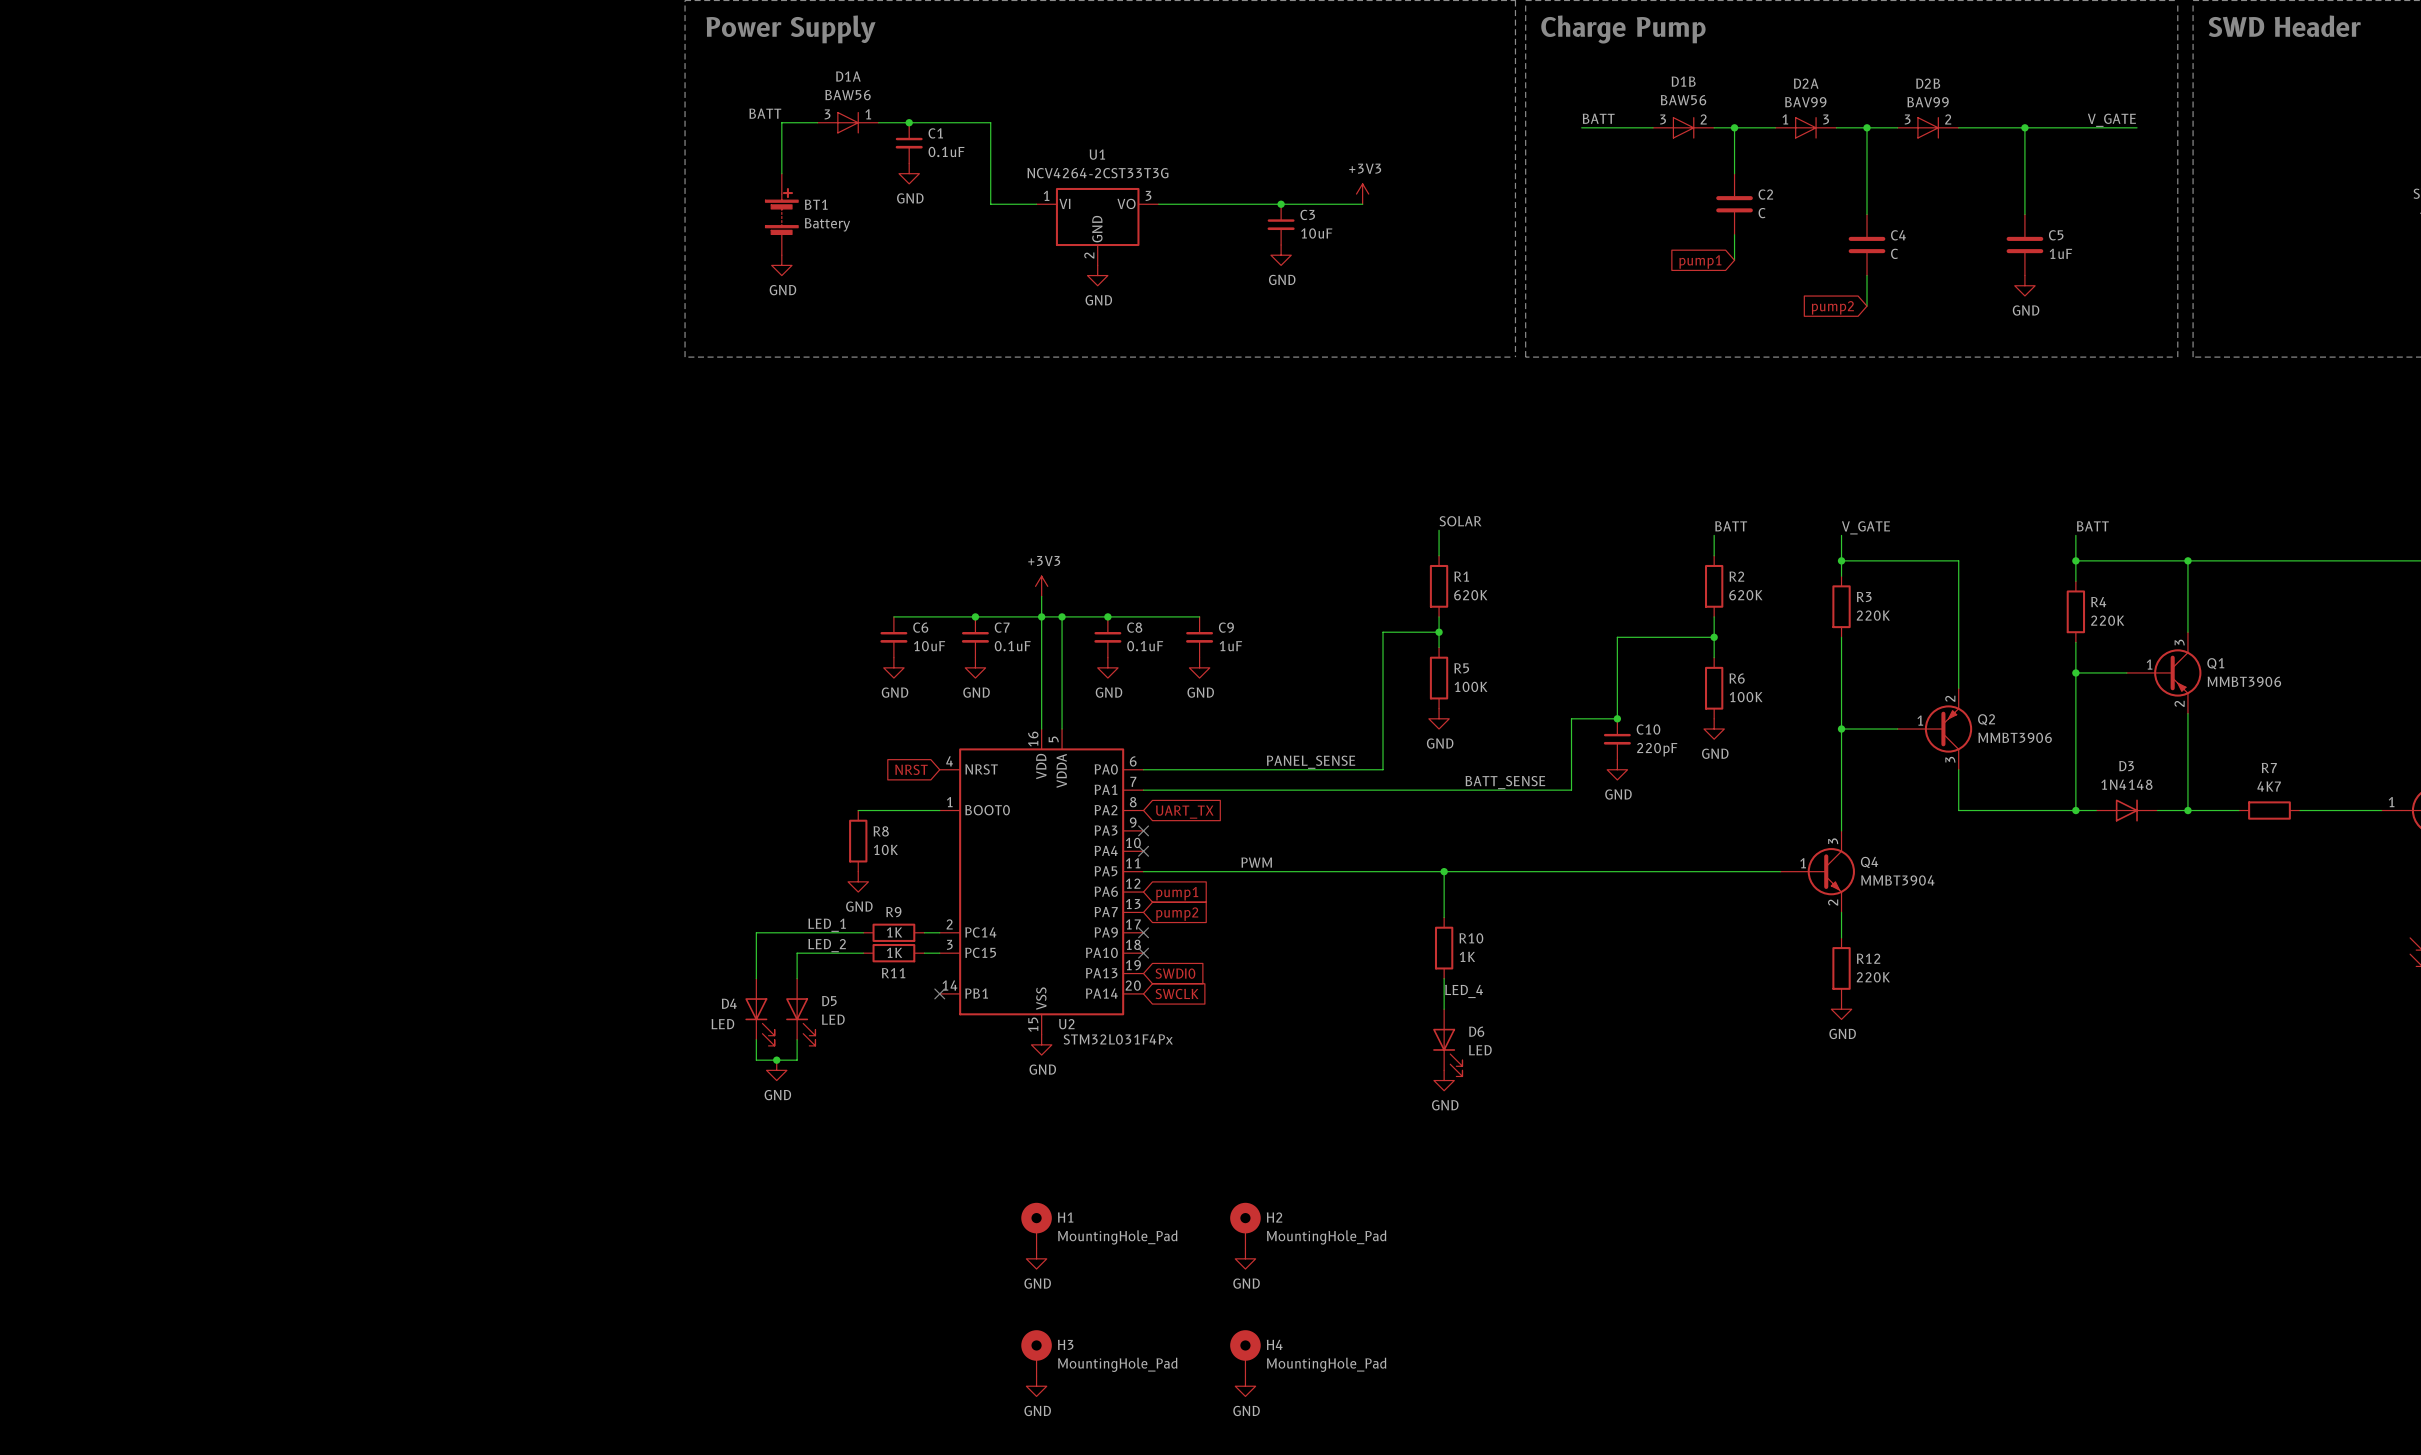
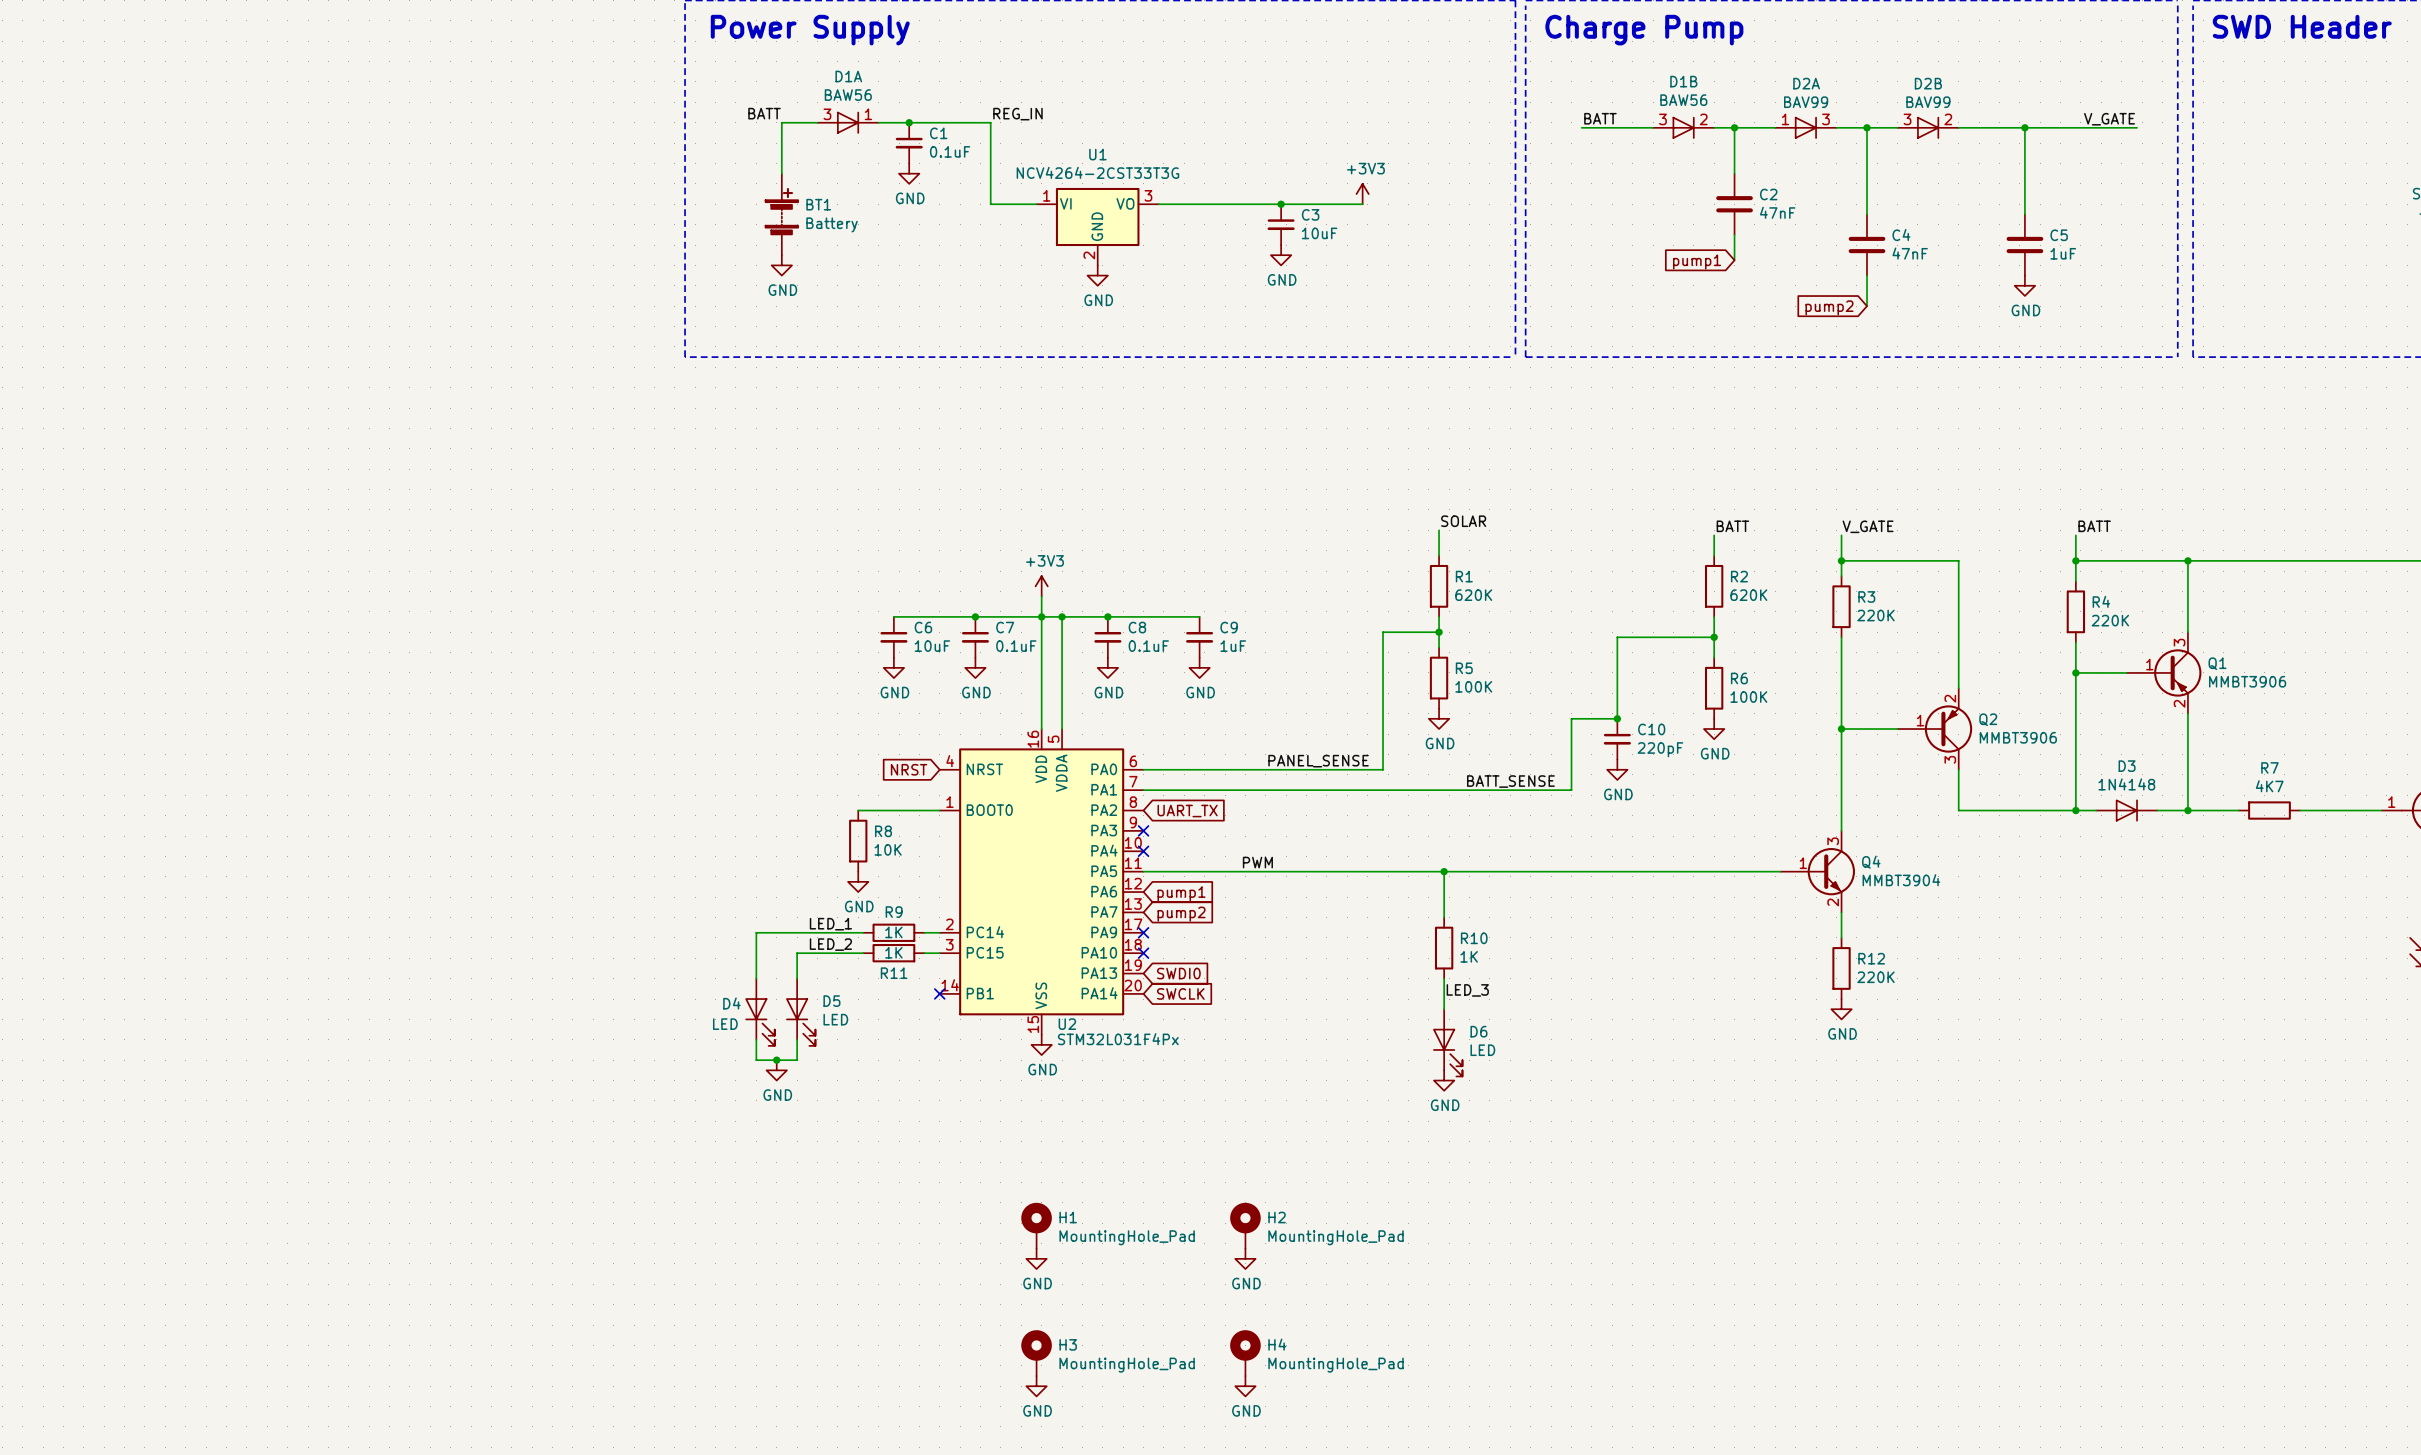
label: none -> REG_IN (1017, 114)
C2 value: C (1762, 213) -> 47nF (1777, 212)
C4 value: C (1894, 253) -> 47nF (1910, 253)
label: LED_4 (1464, 991) -> LED_3 (1467, 990)

